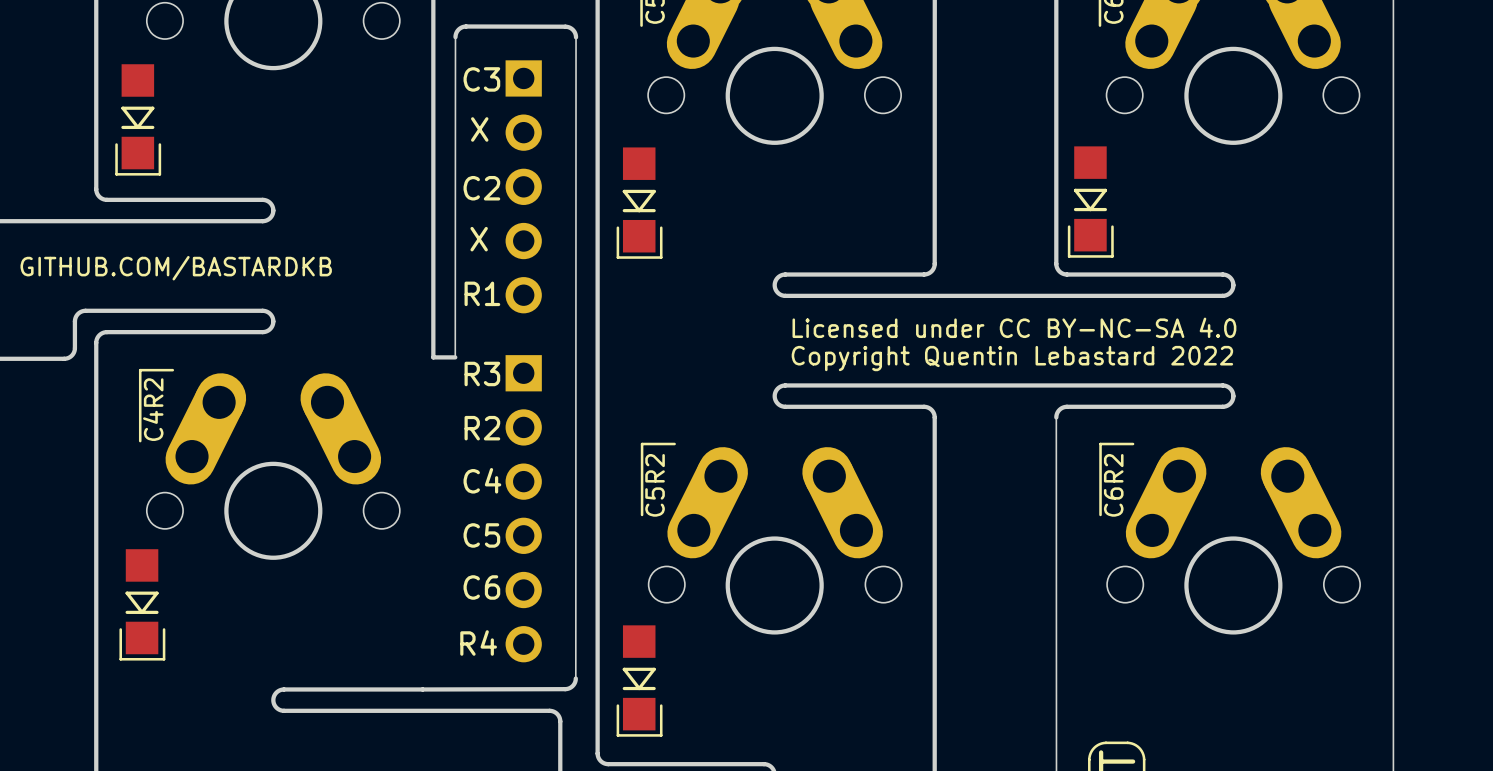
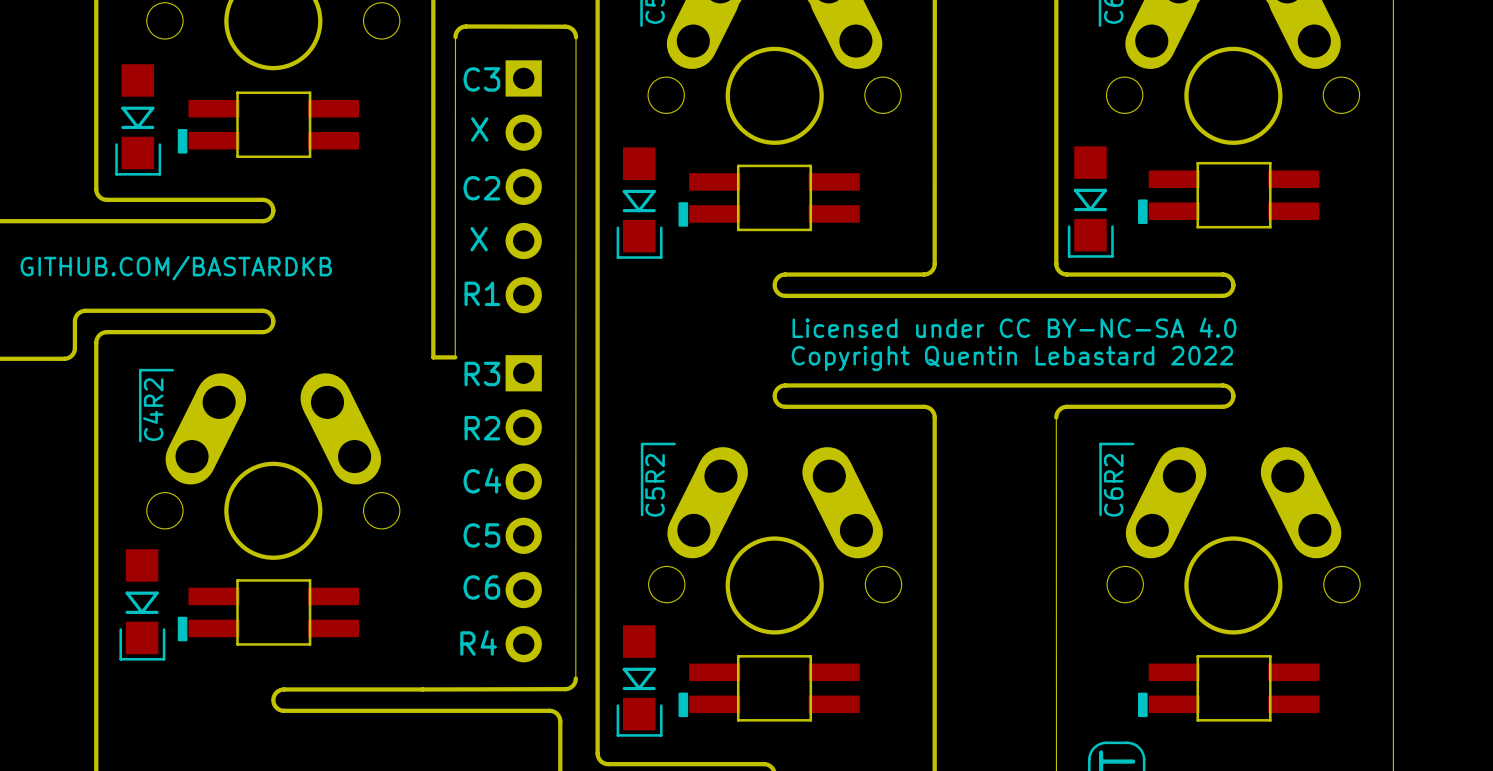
part: none -> (268, 124)
part: none -> (1228, 195)
part: none -> (769, 197)
part: none -> (268, 612)
part: none -> (769, 688)
part: none -> (1228, 688)

